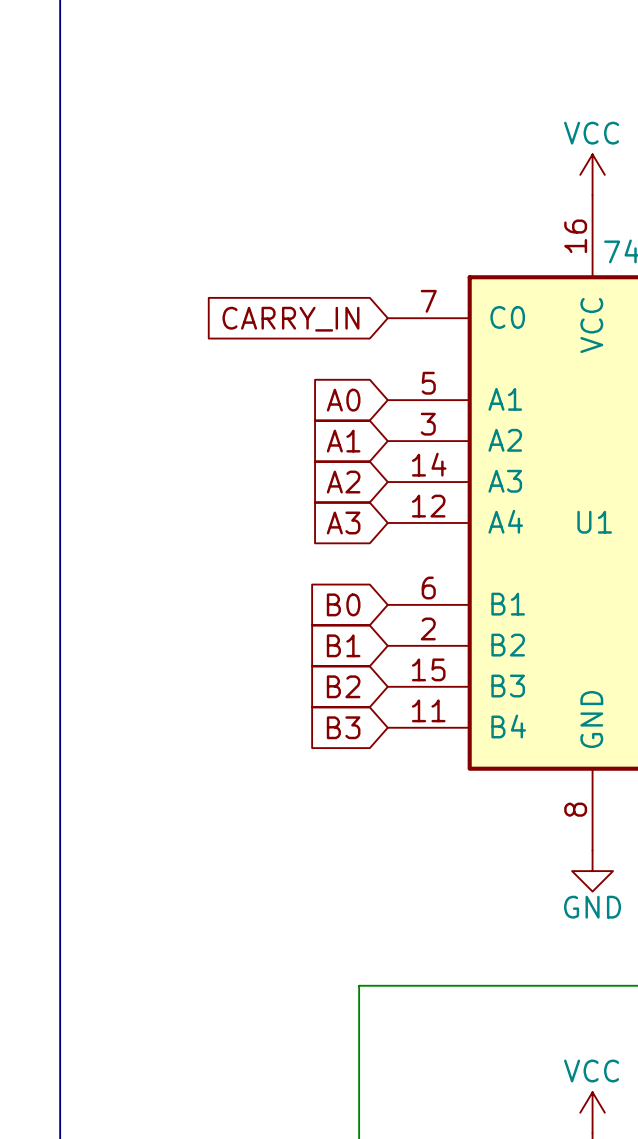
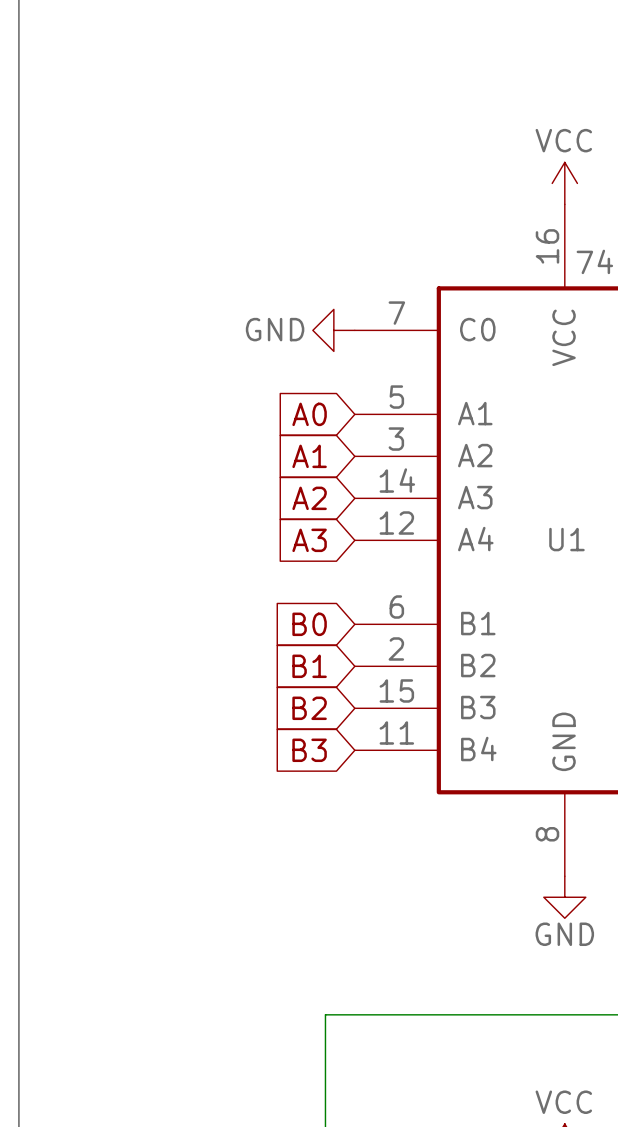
power symbol: none -> GND (333, 330)
global label: CARRY_IN (290, 319) -> none

